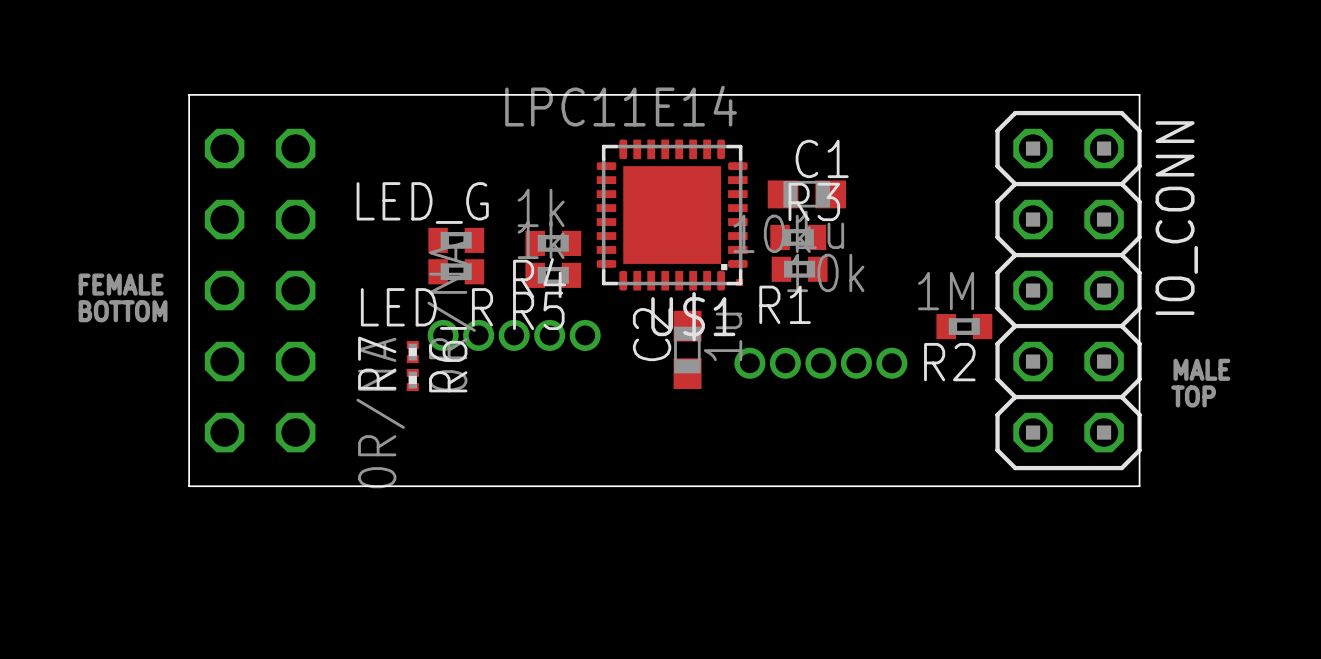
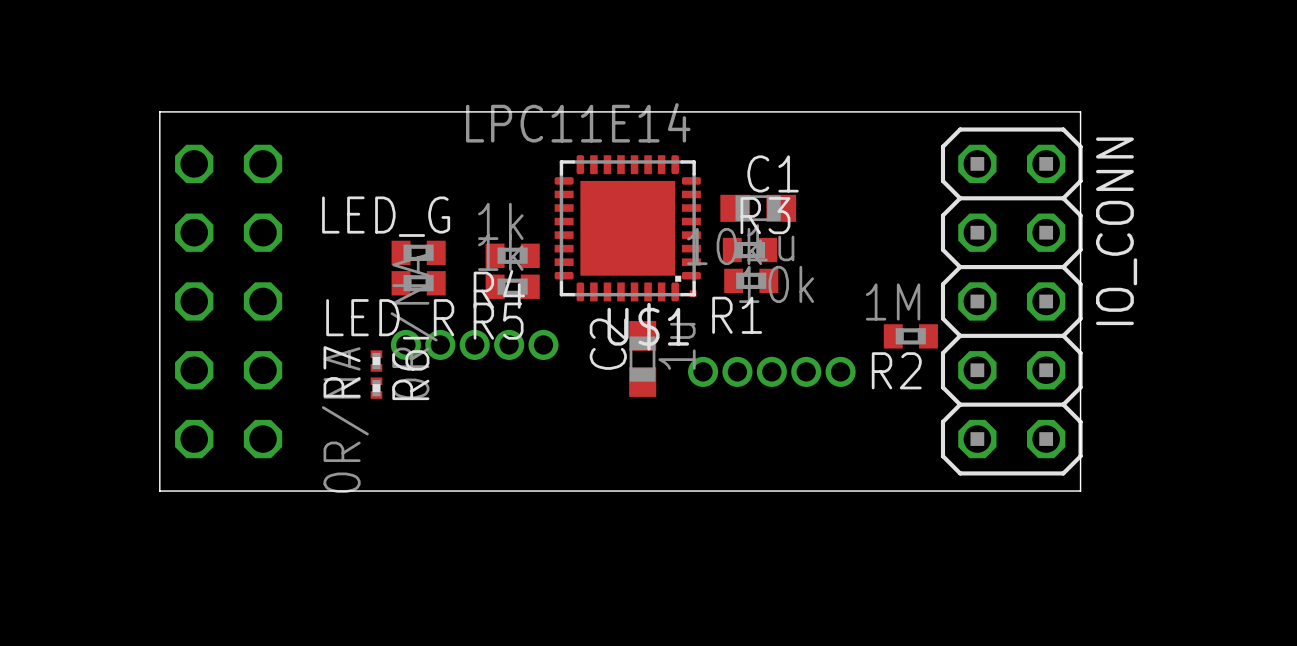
text: FEMALE (121, 284) -> none
text: BOTTOM (123, 311) -> none
text: MALE (1201, 369) -> none
text: TOP (1193, 396) -> none

